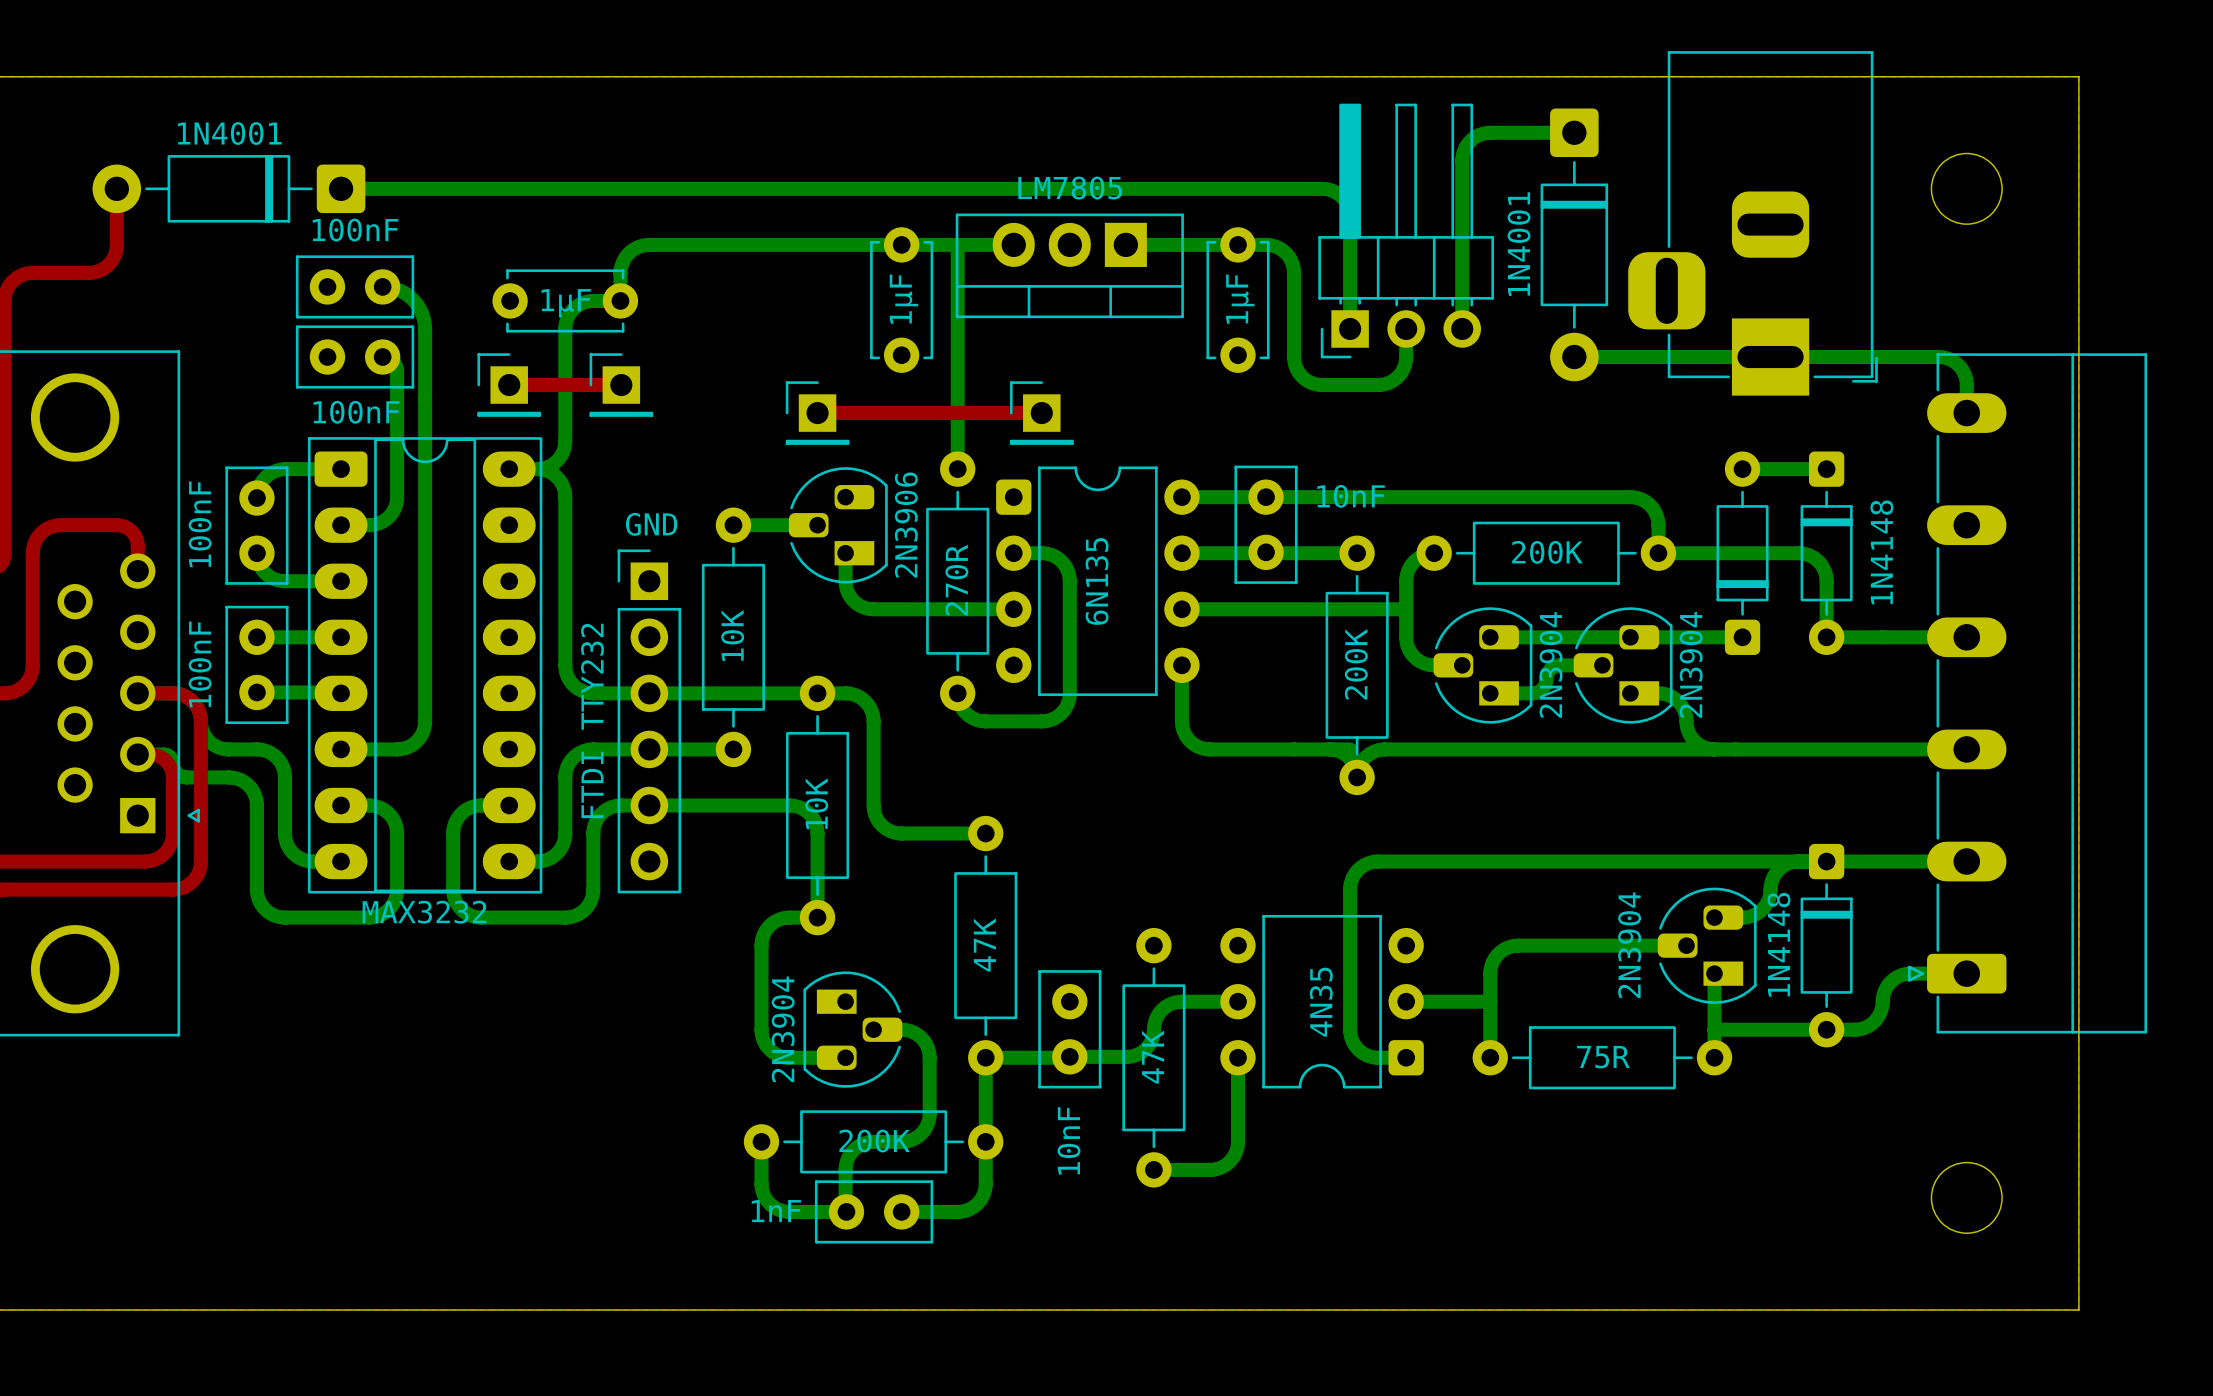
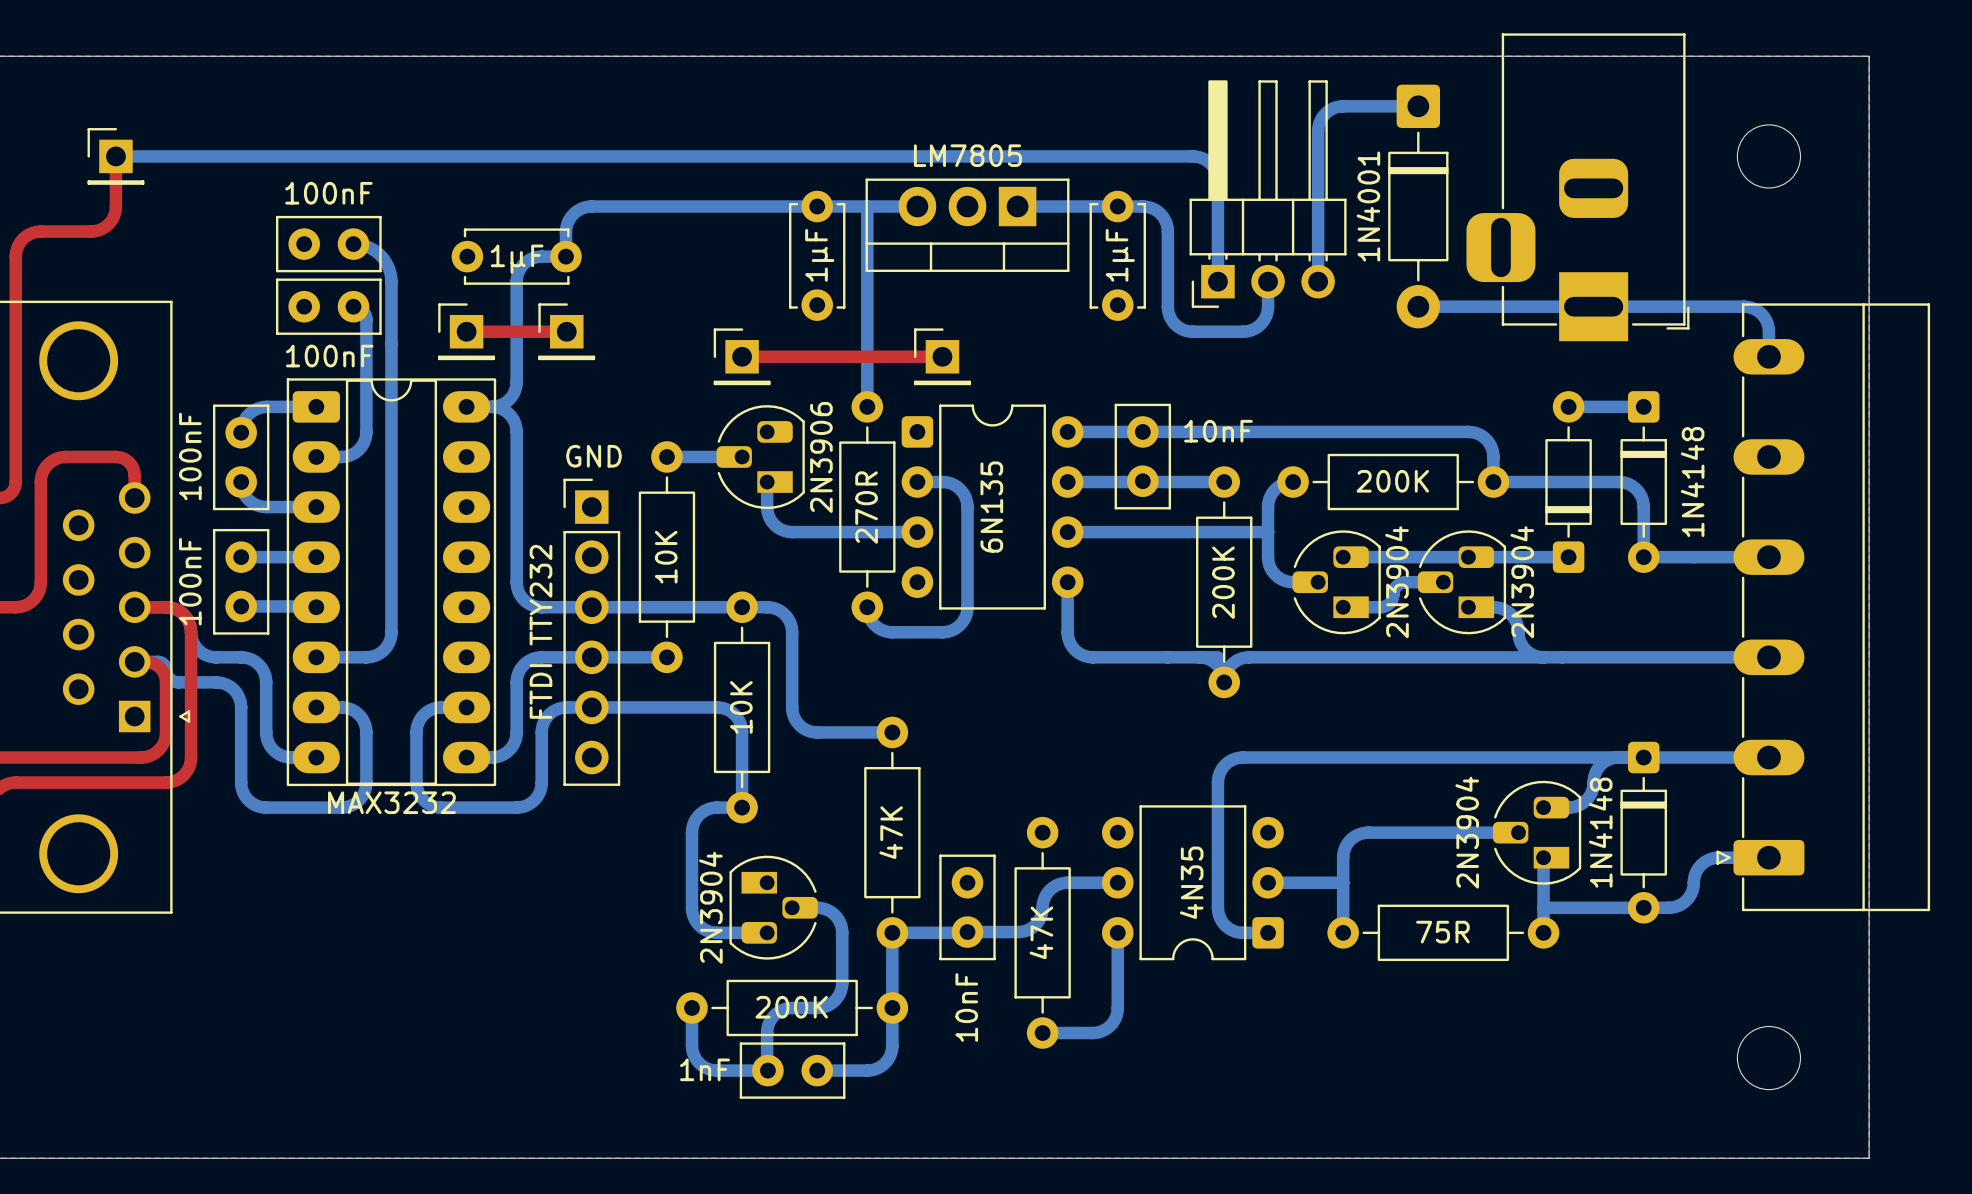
bottom track: none -> (115, 156) (316, 156)
part: none -> (115, 156)
part: 1N4001 (228, 188) -> none

